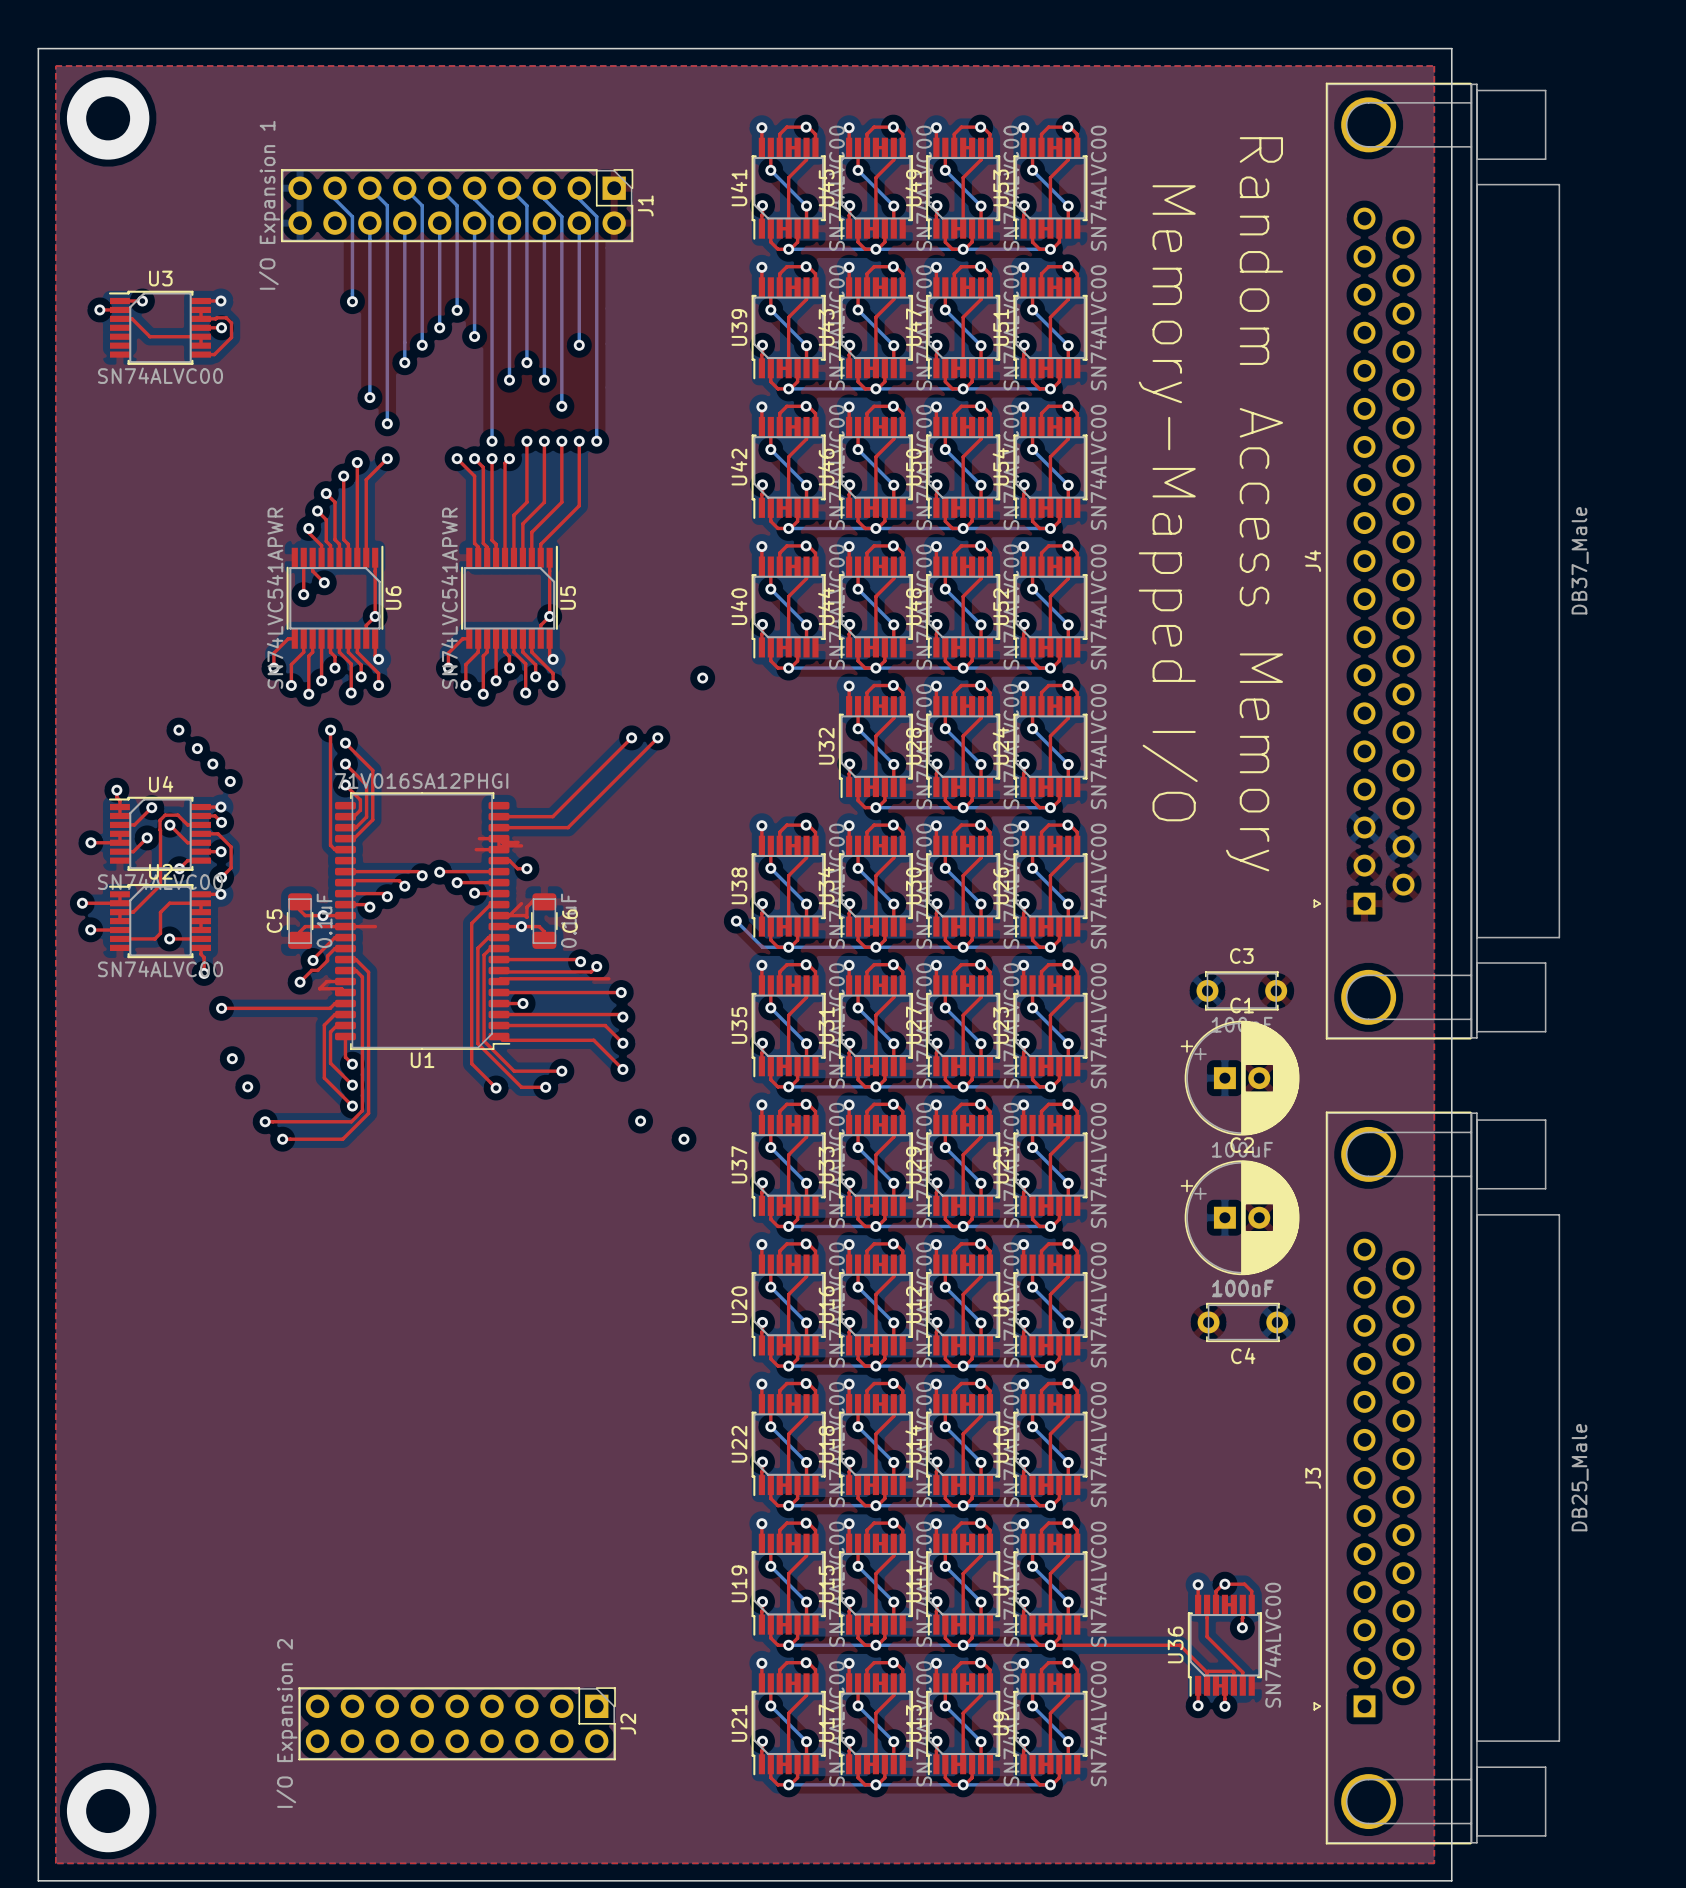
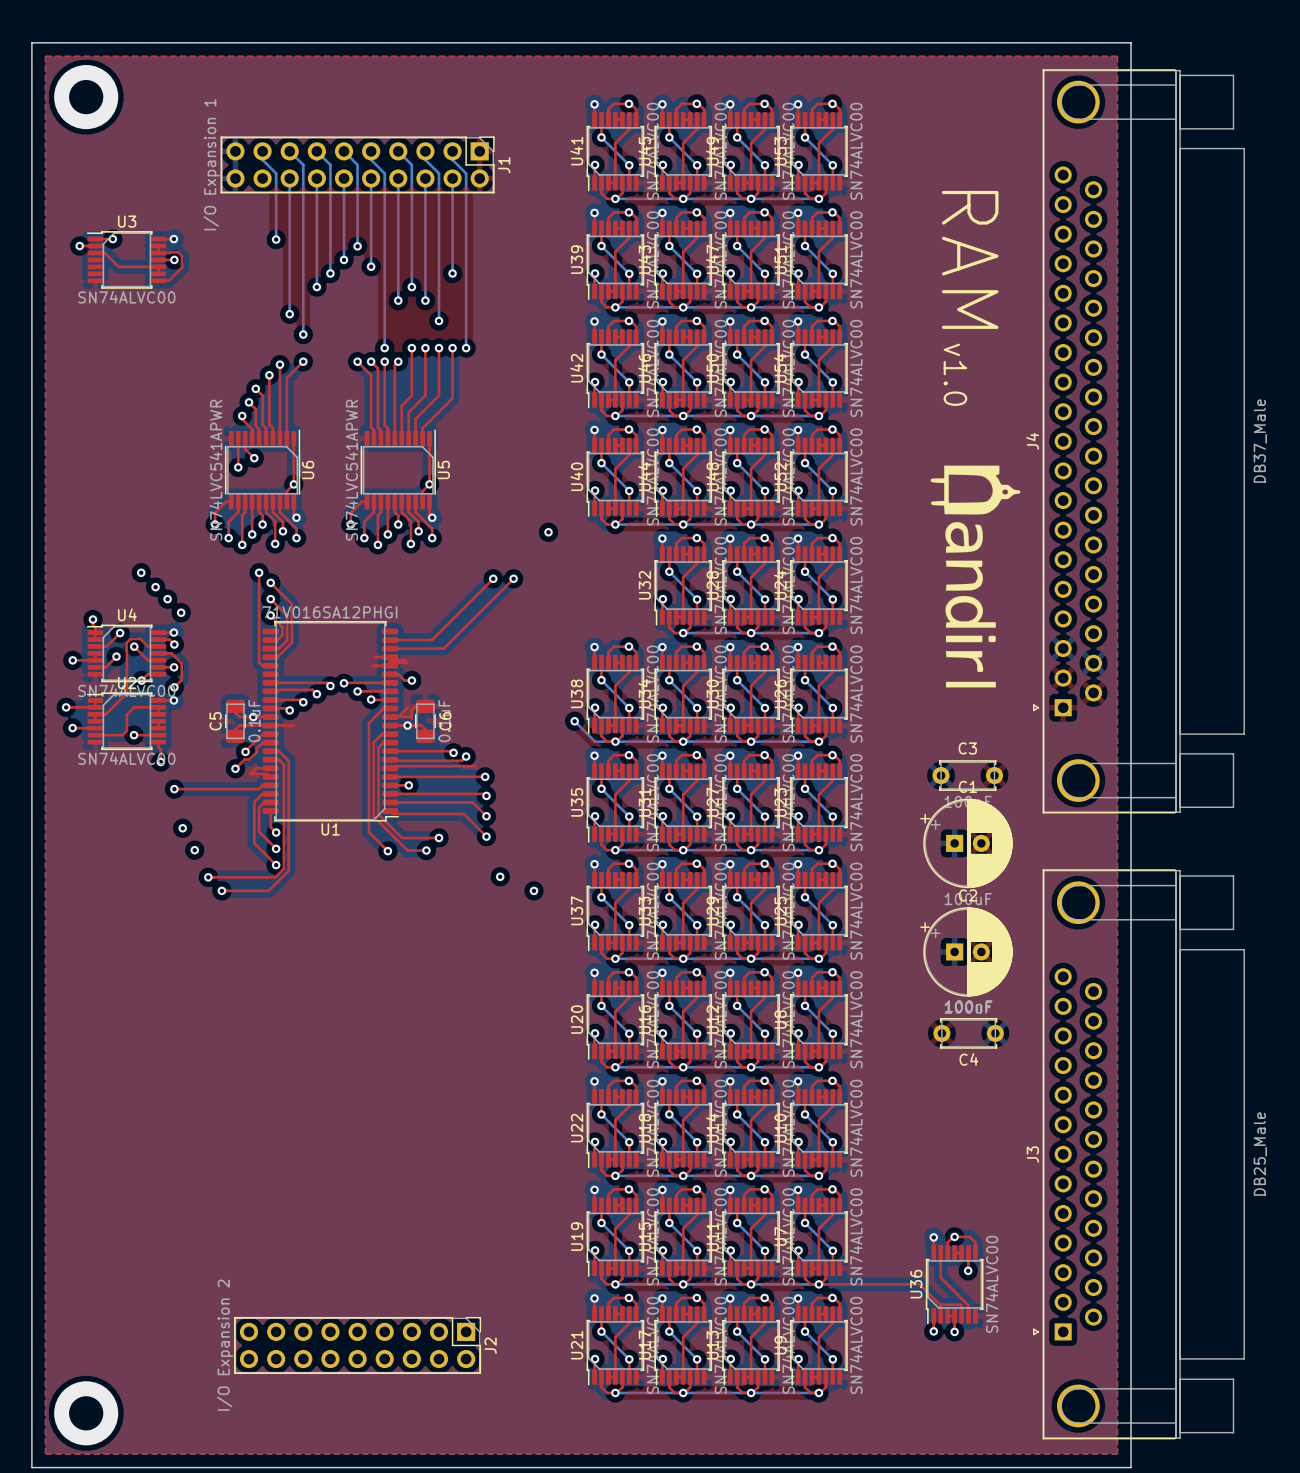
J4 footprint: [1313, 82, 1561, 1040] -> [1033, 69, 1245, 814]
text: none -> RAM (970, 259)
text: none -> v1.0 (955, 374)
text: Memory-Mapped I/O (1168, 503) -> none
text: Random Access Memory (1254, 504) -> none
drawing: none -> [930, 465, 1021, 688]
J3 footprint: [1313, 1111, 1561, 1845] -> [1033, 869, 1245, 1440]

